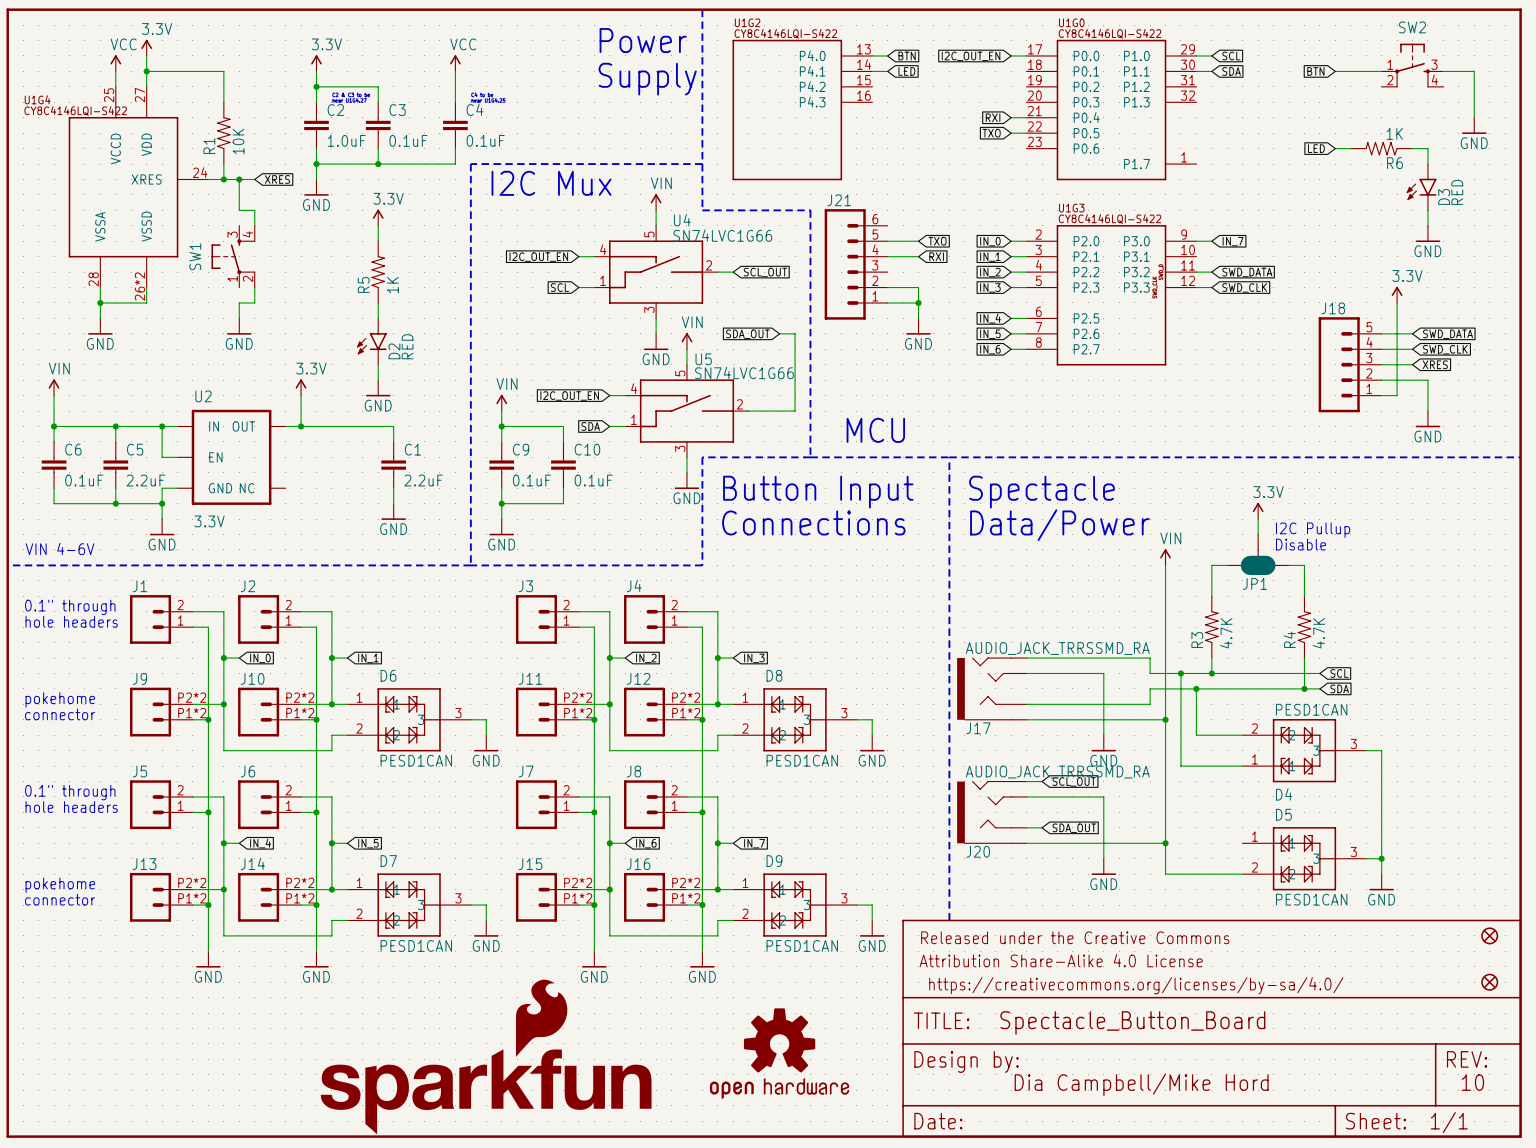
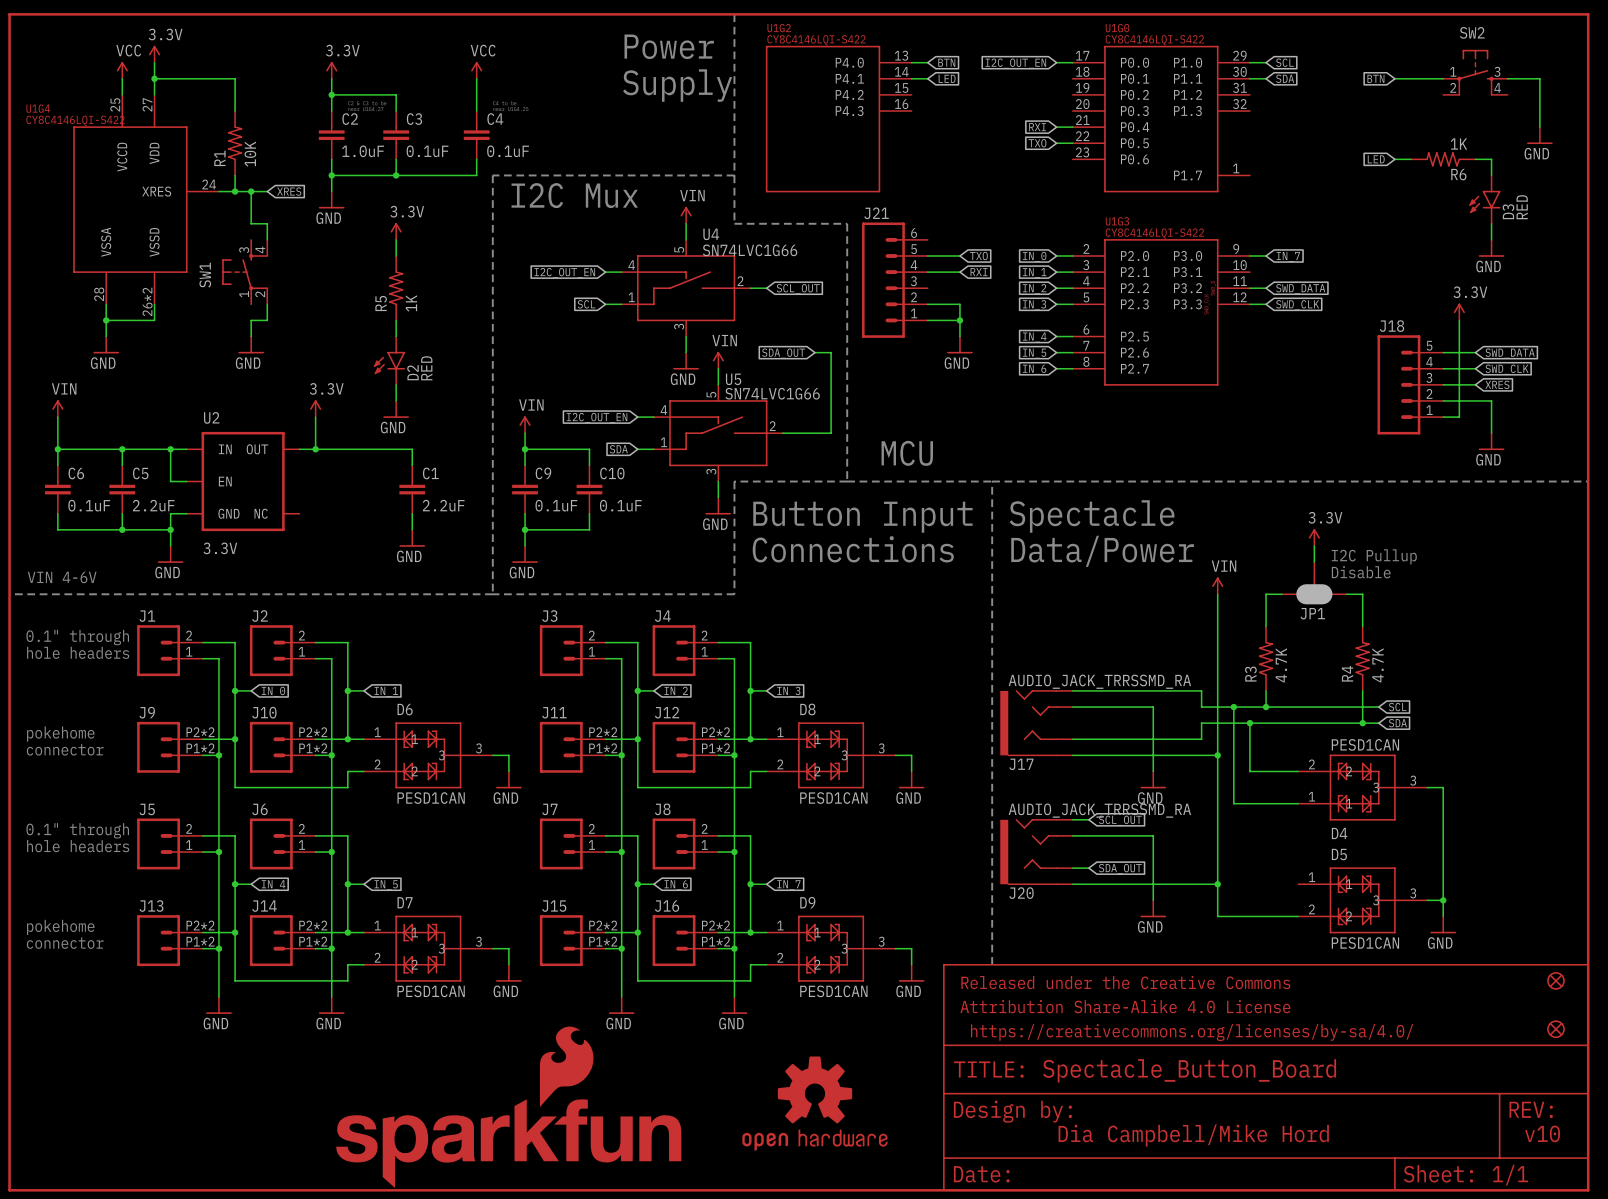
text: 10 (1472, 1082) -> v10 (1542, 1133)

